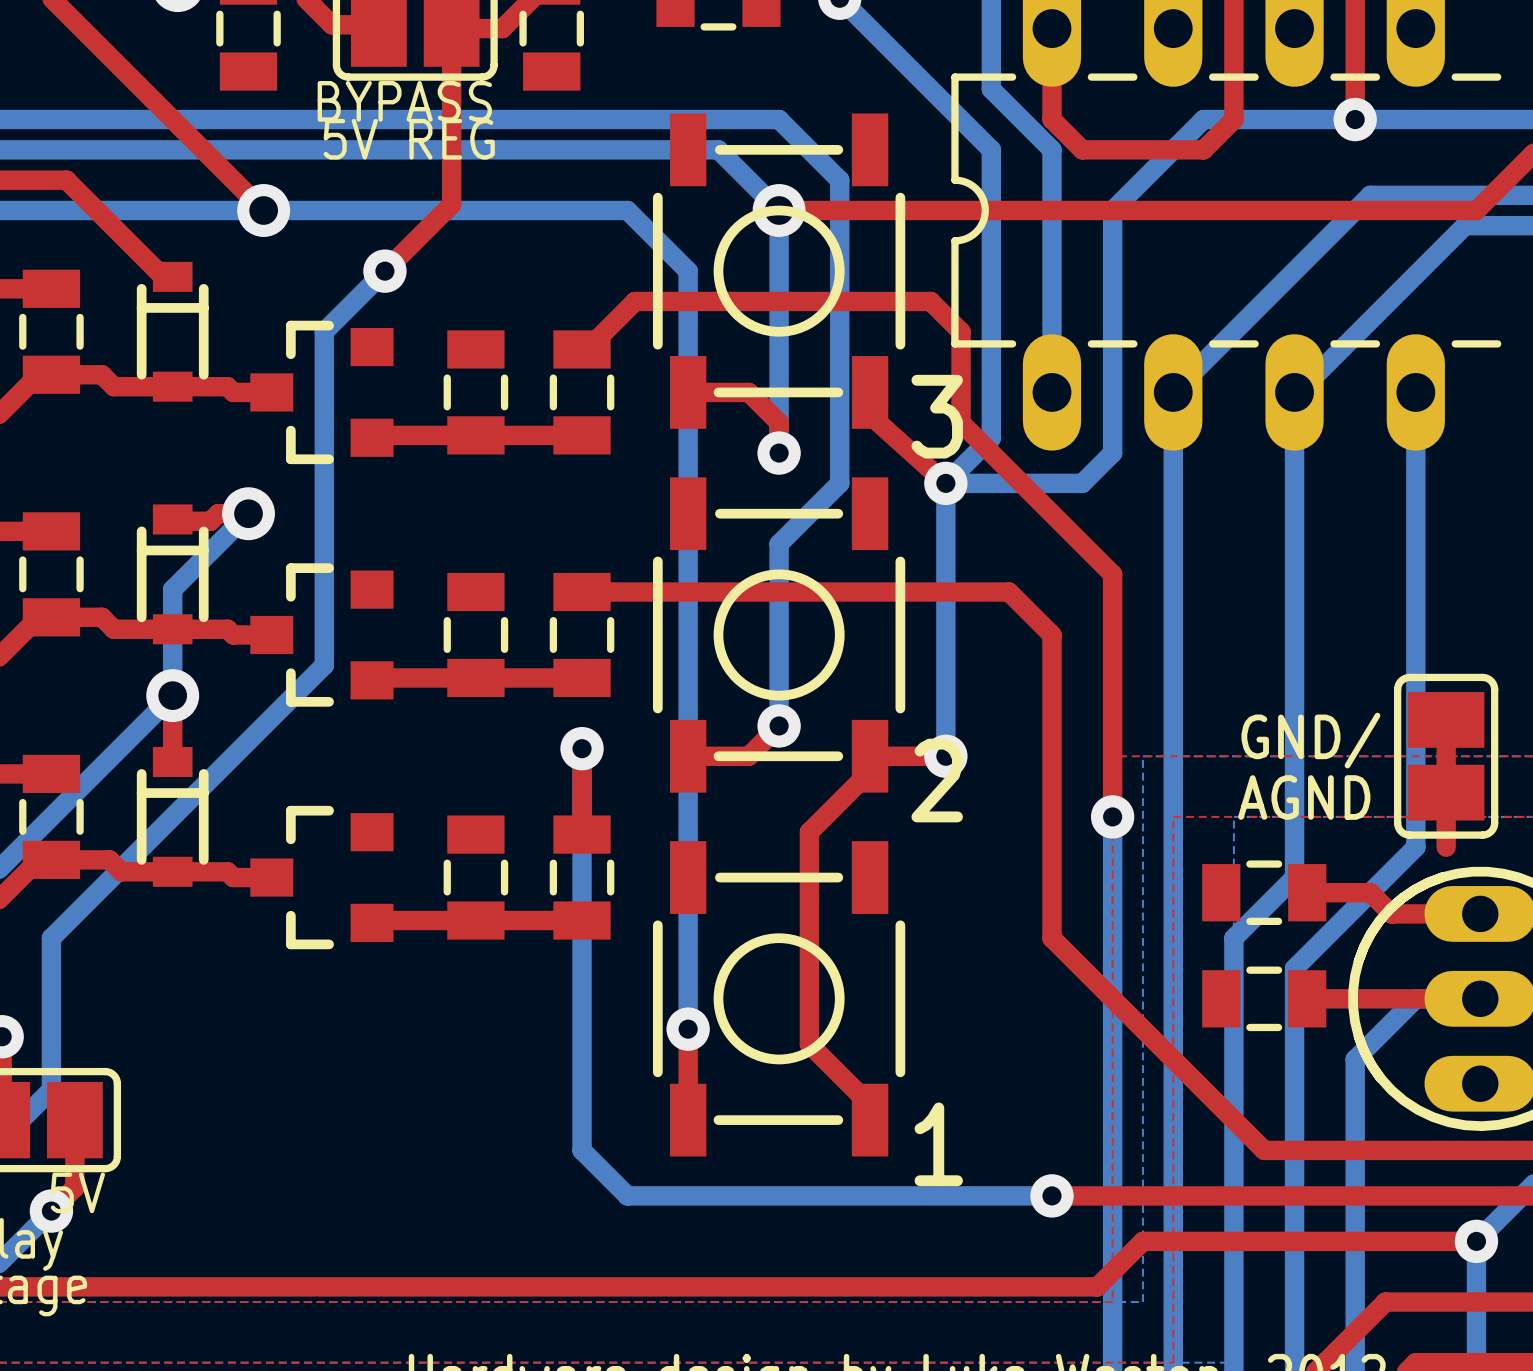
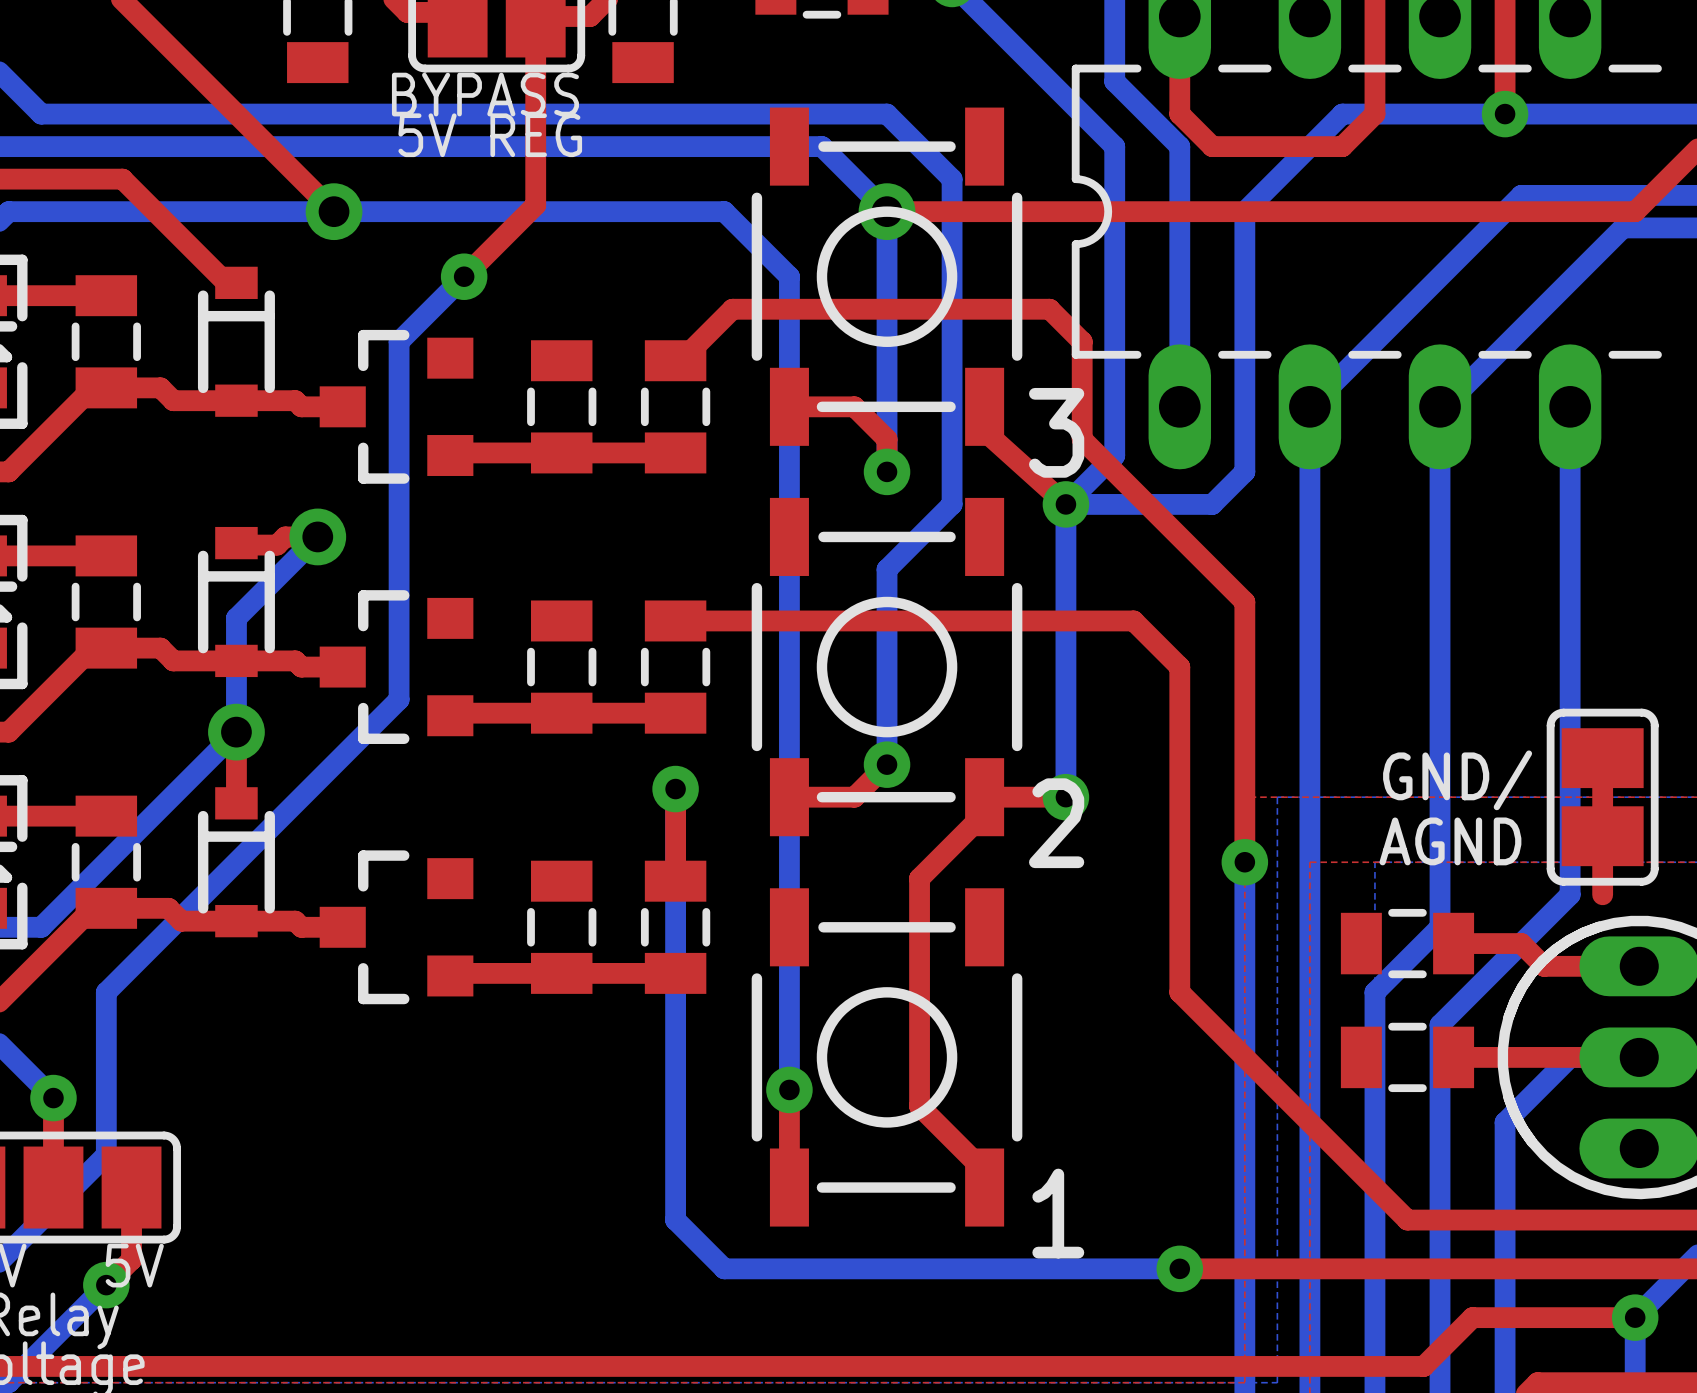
top track: (1324, 1241) (1142, 1241) (1097, 1286) -> (1472, 1317) (1423, 1366) (1228, 1366)

